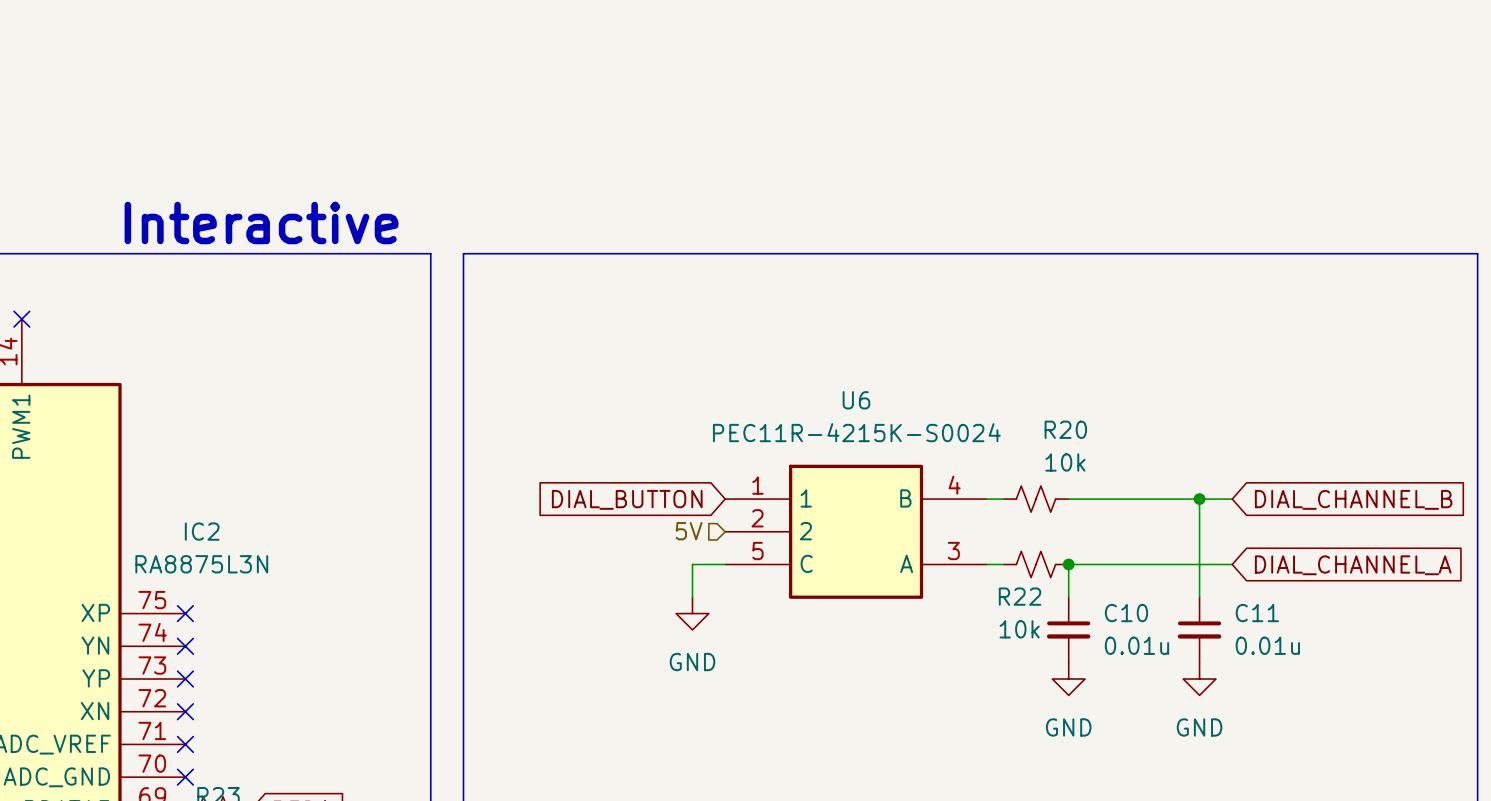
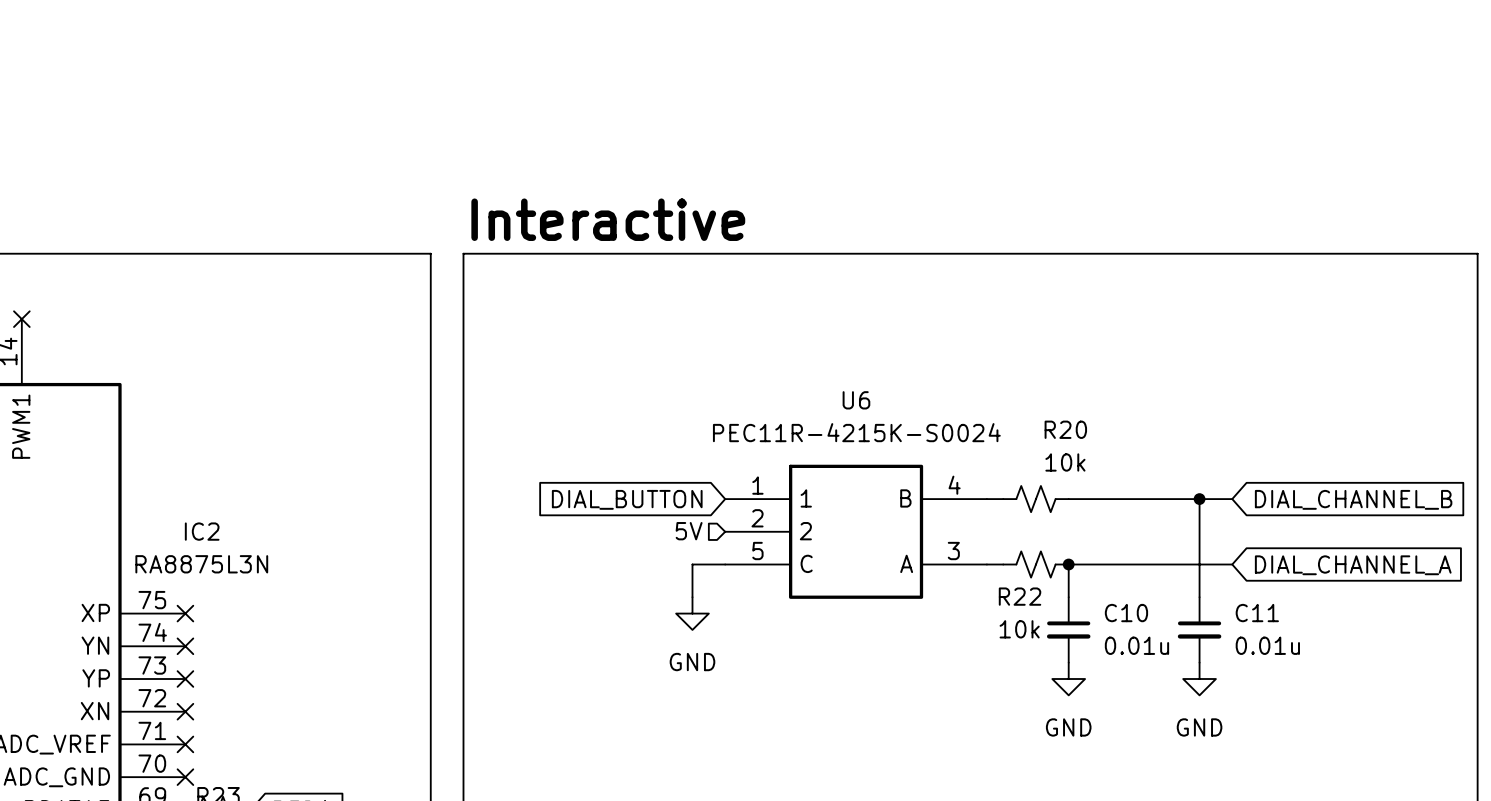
text: none -> Interactive (608, 219)
text: Interactive (261, 222) -> none

